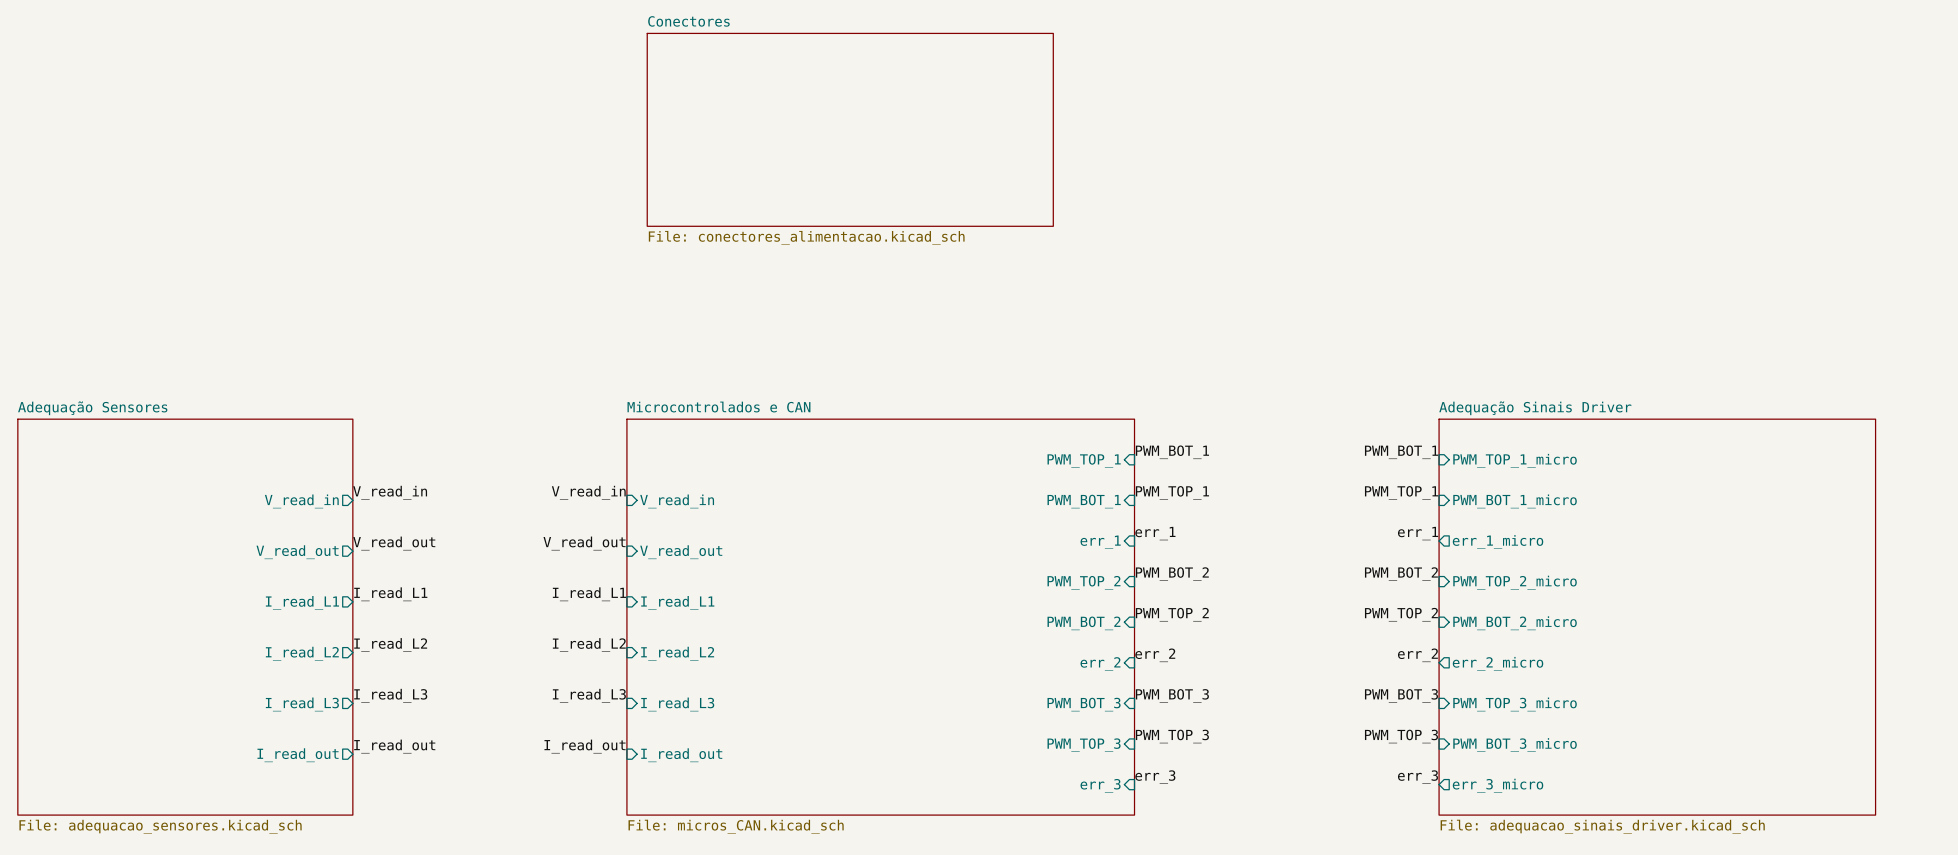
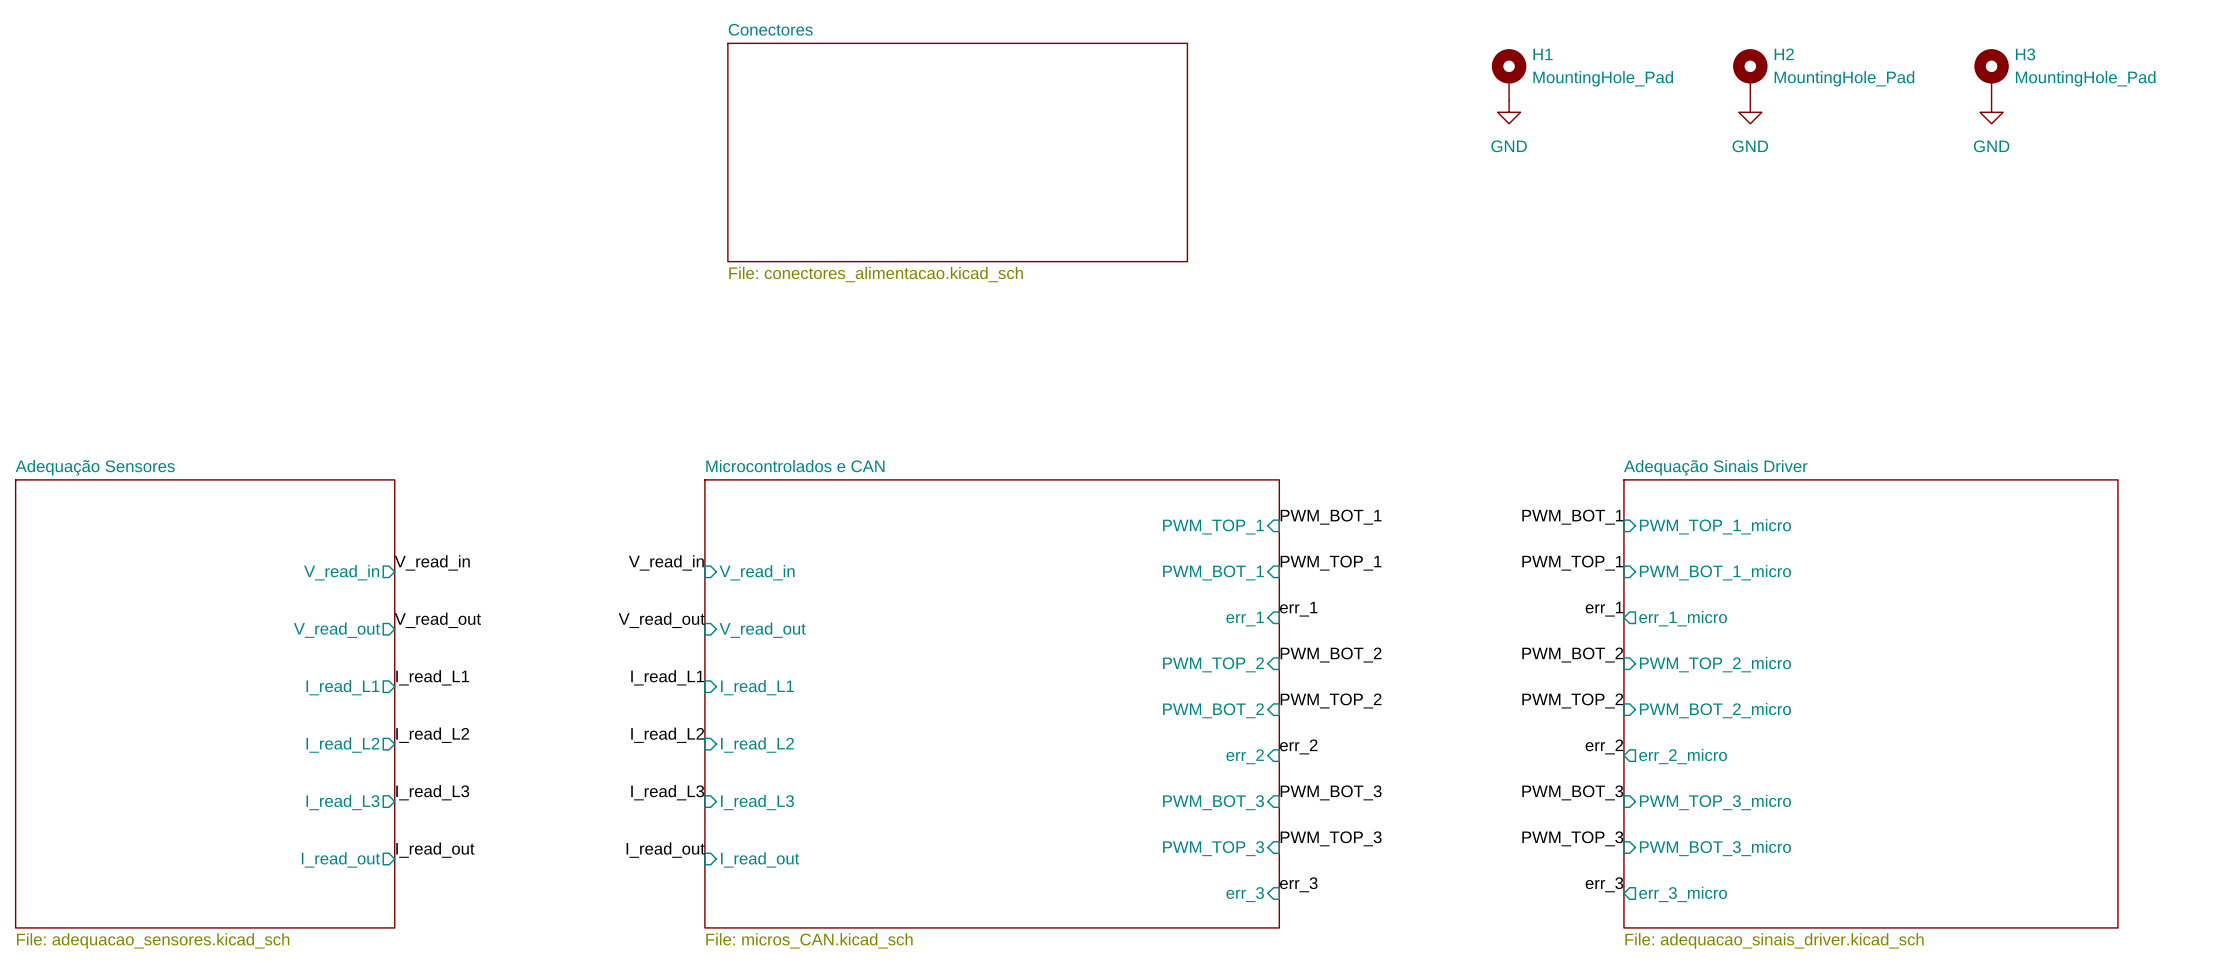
H1: none -> MountingHole_Pad (1509, 74)
H2: none -> MountingHole_Pad (1750, 74)
H3: none -> MountingHole_Pad (1991, 74)
power symbol: none -> GND (1509, 112)
power symbol: none -> GND (1750, 112)
power symbol: none -> GND (1991, 112)

